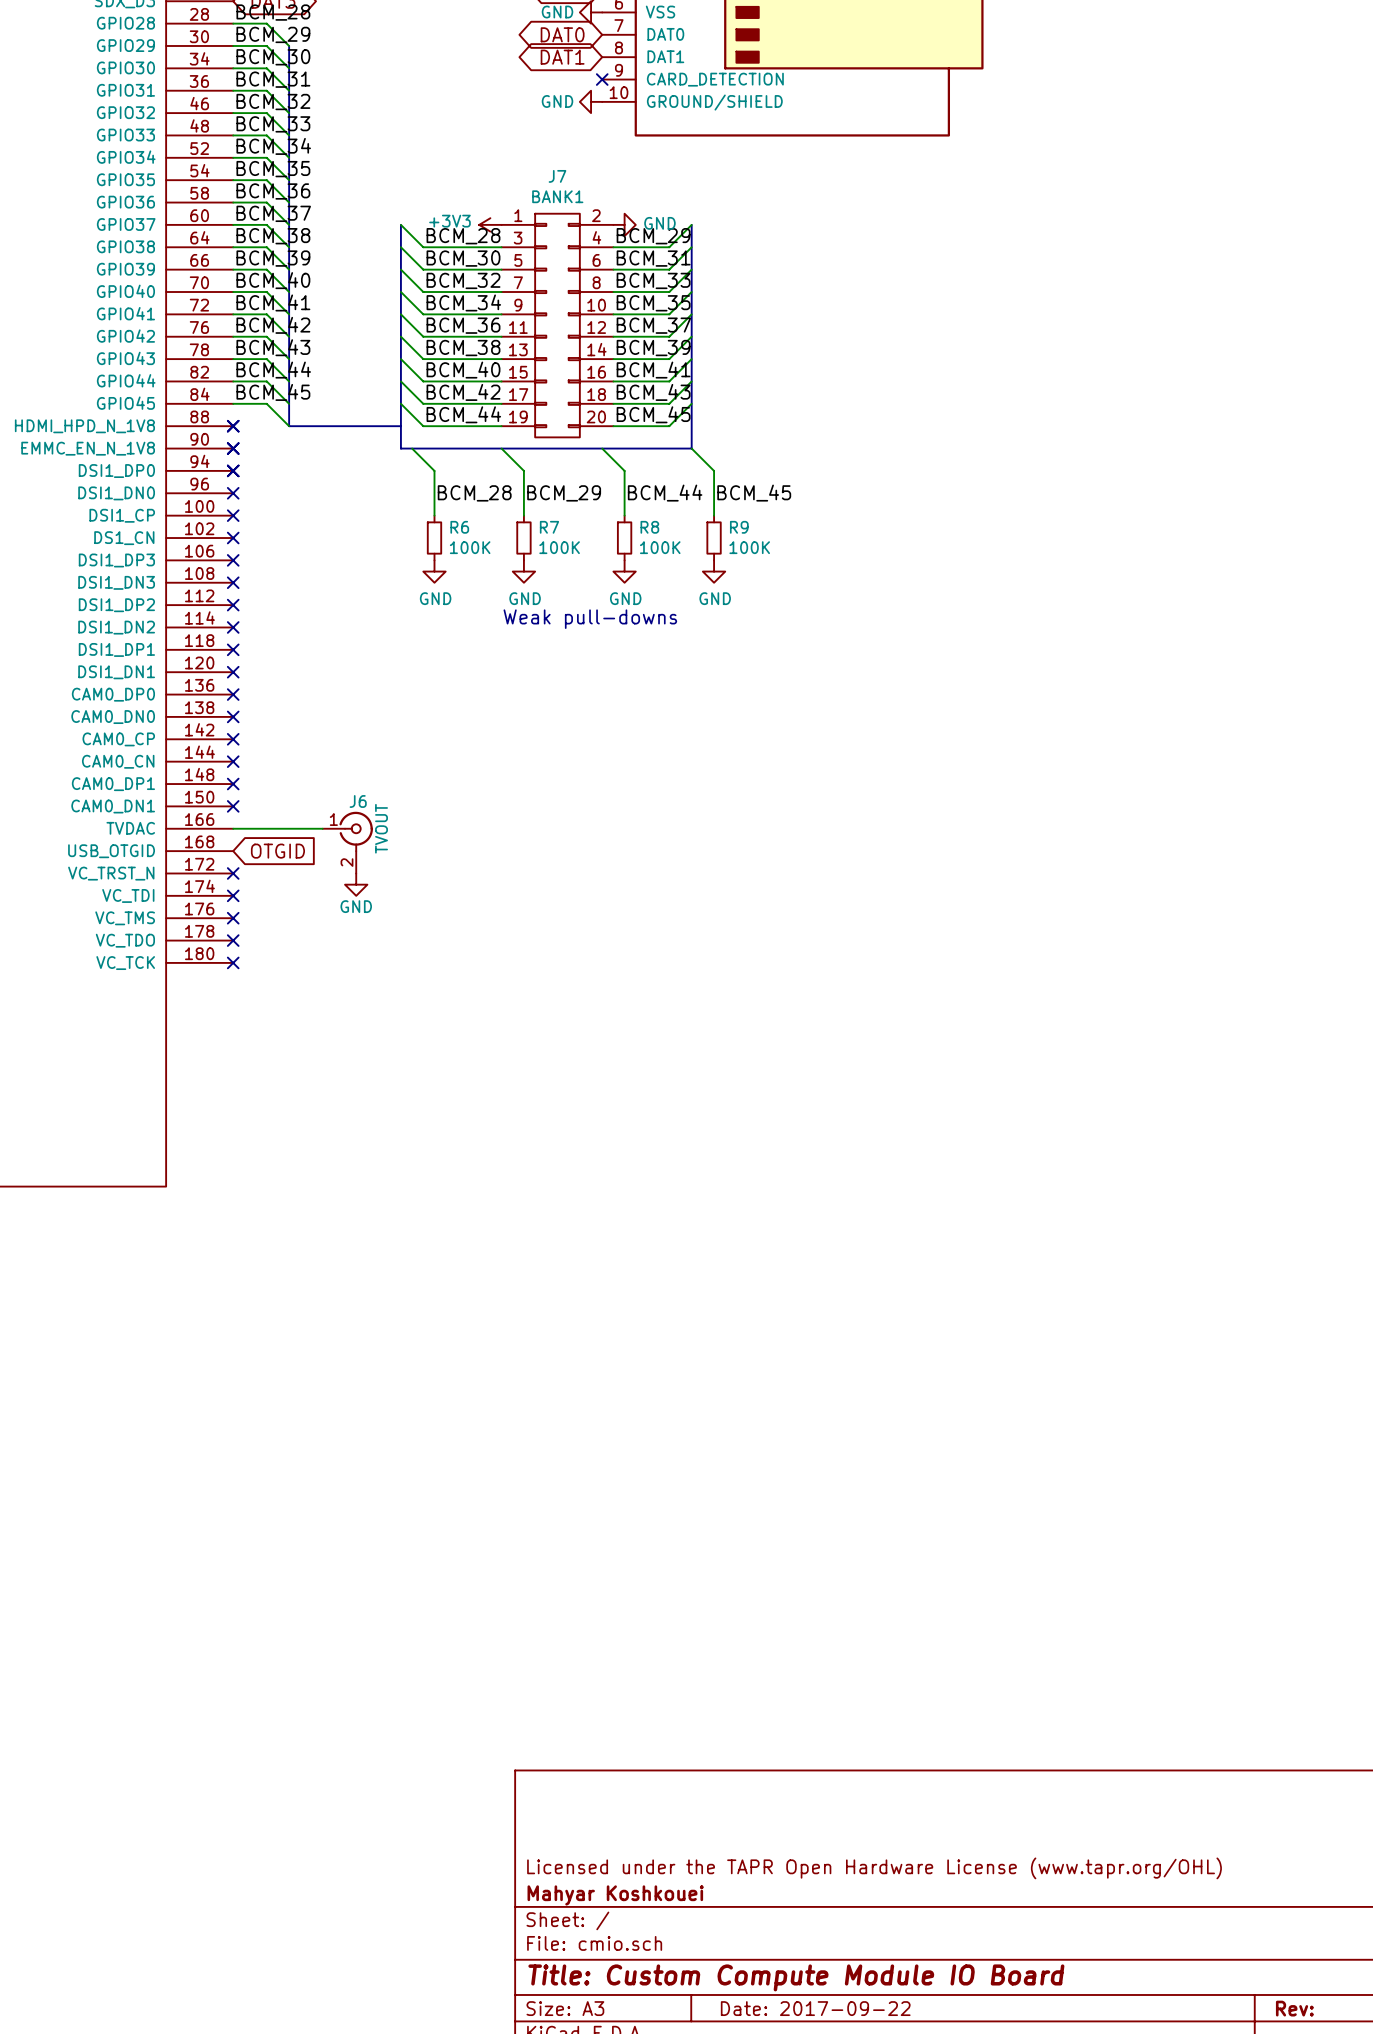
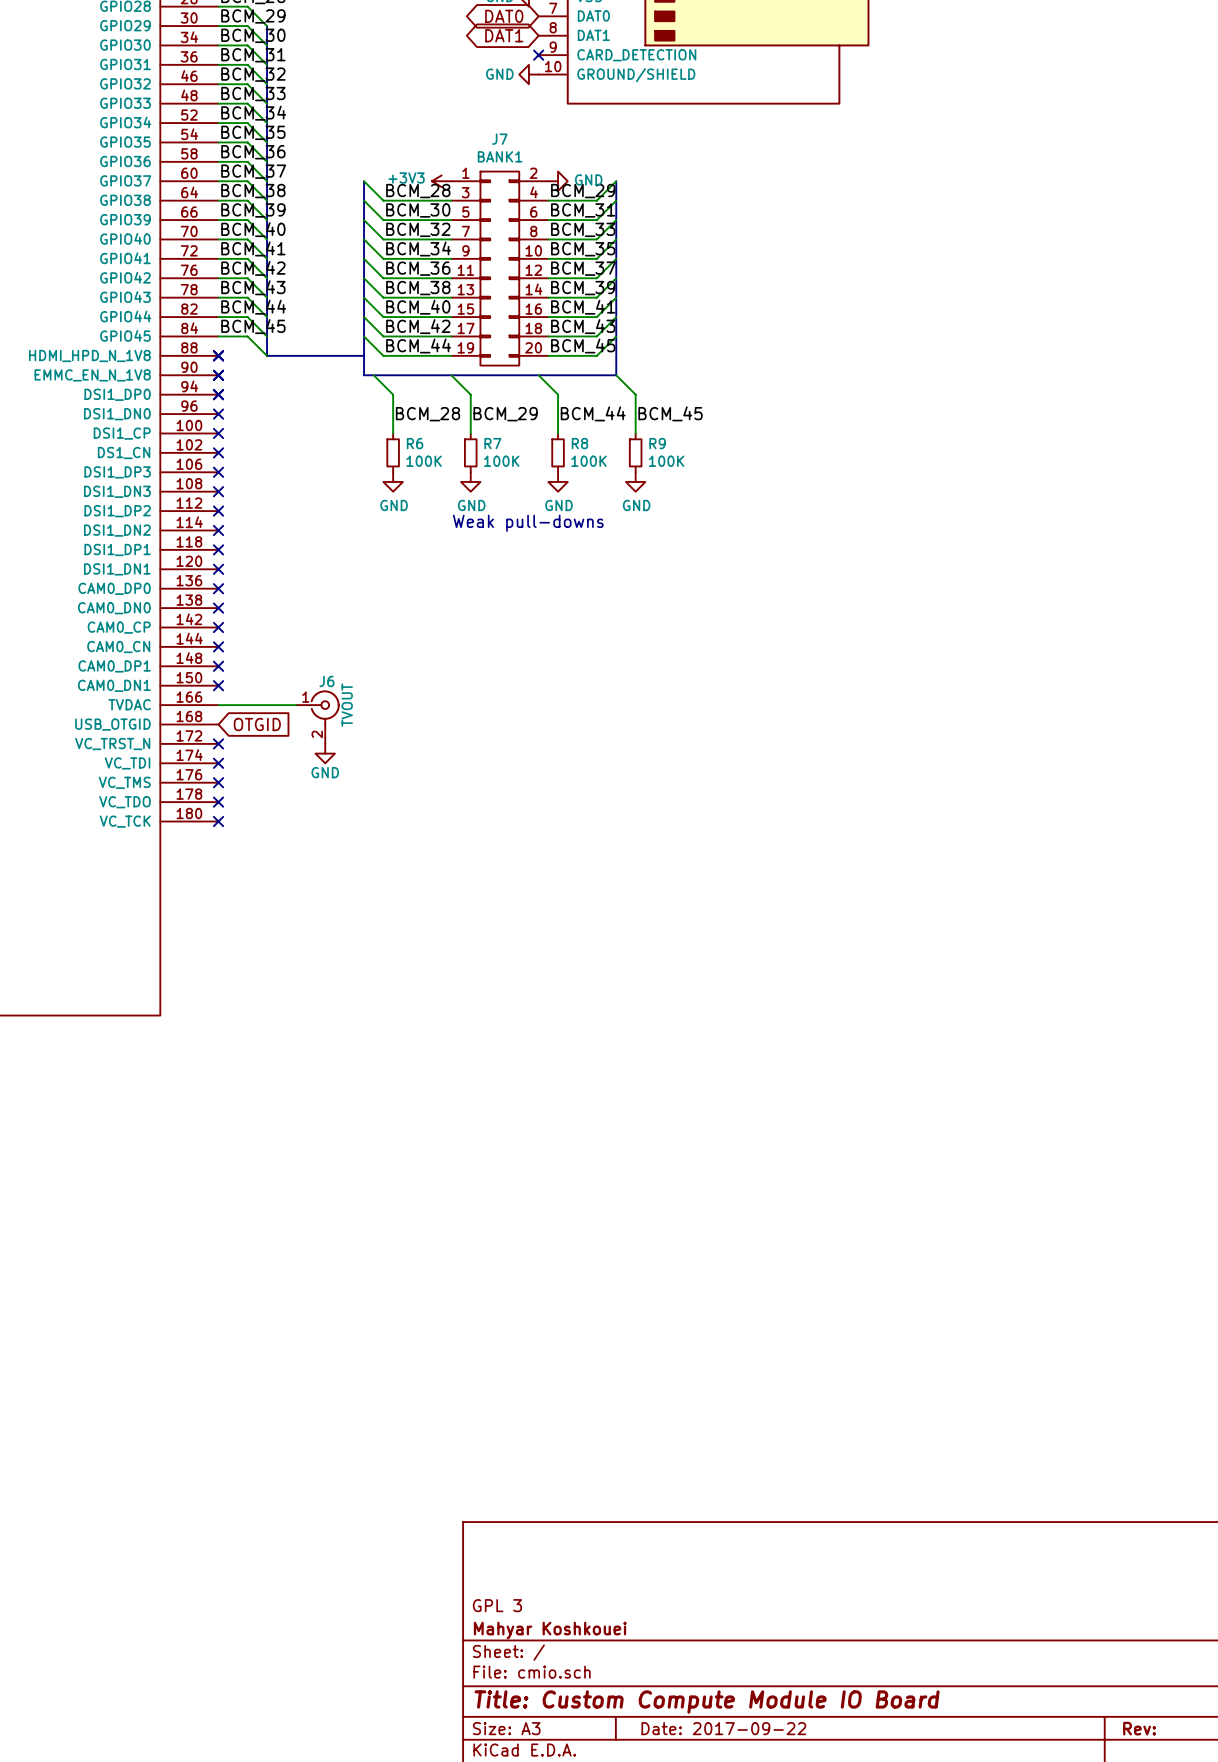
title block: Licensed under the TAPR Open Hardware License (www.tapr.org/OHL) (874, 1868) -> GPL 3 (497, 1605)

